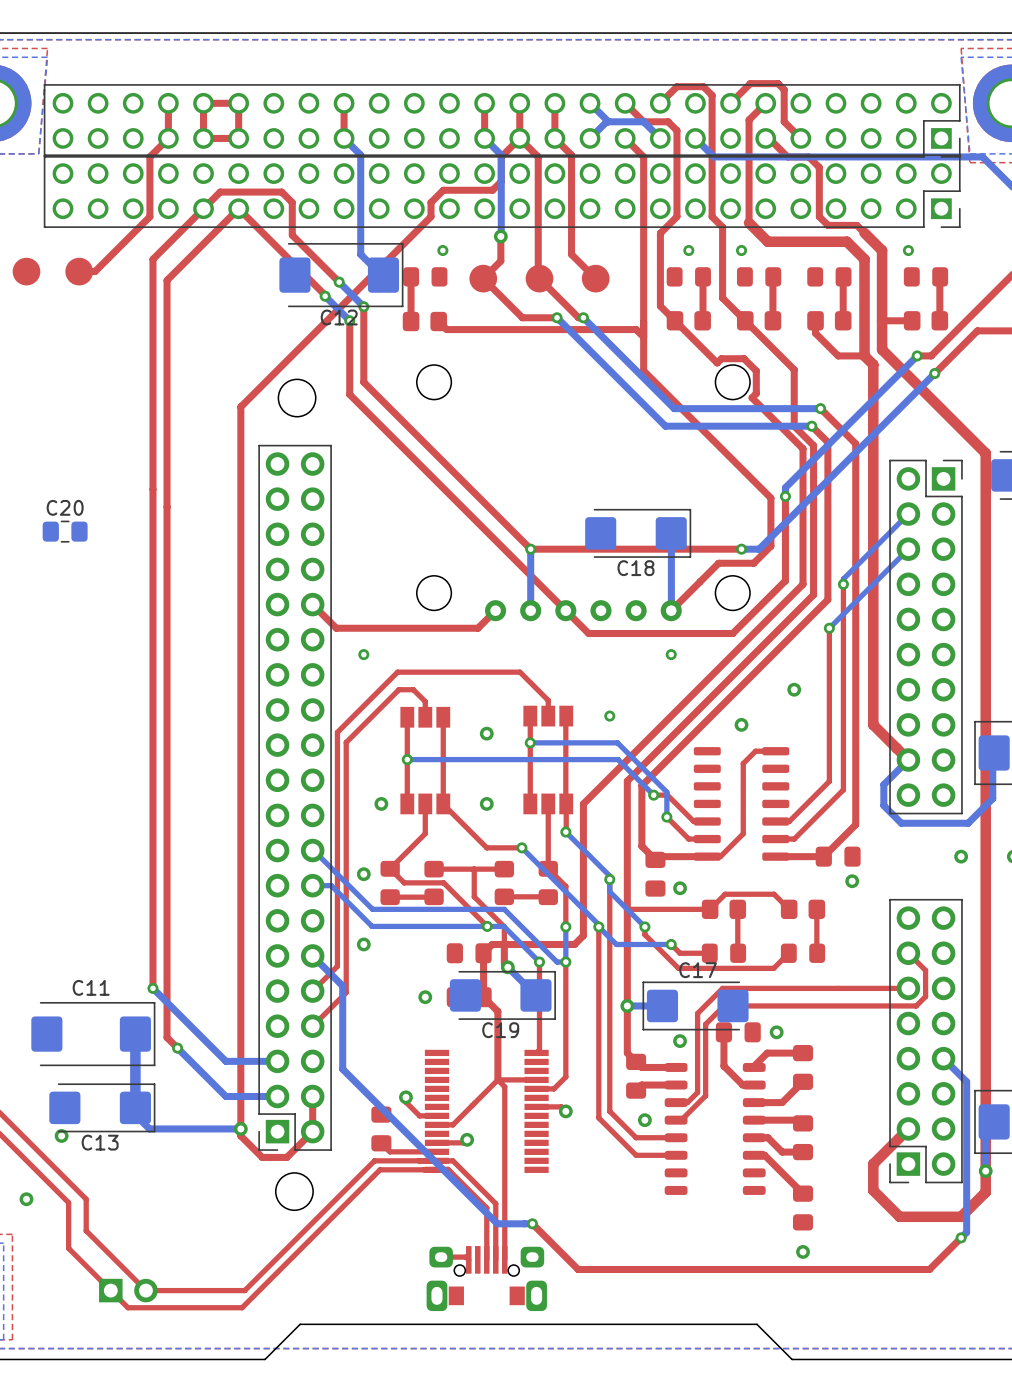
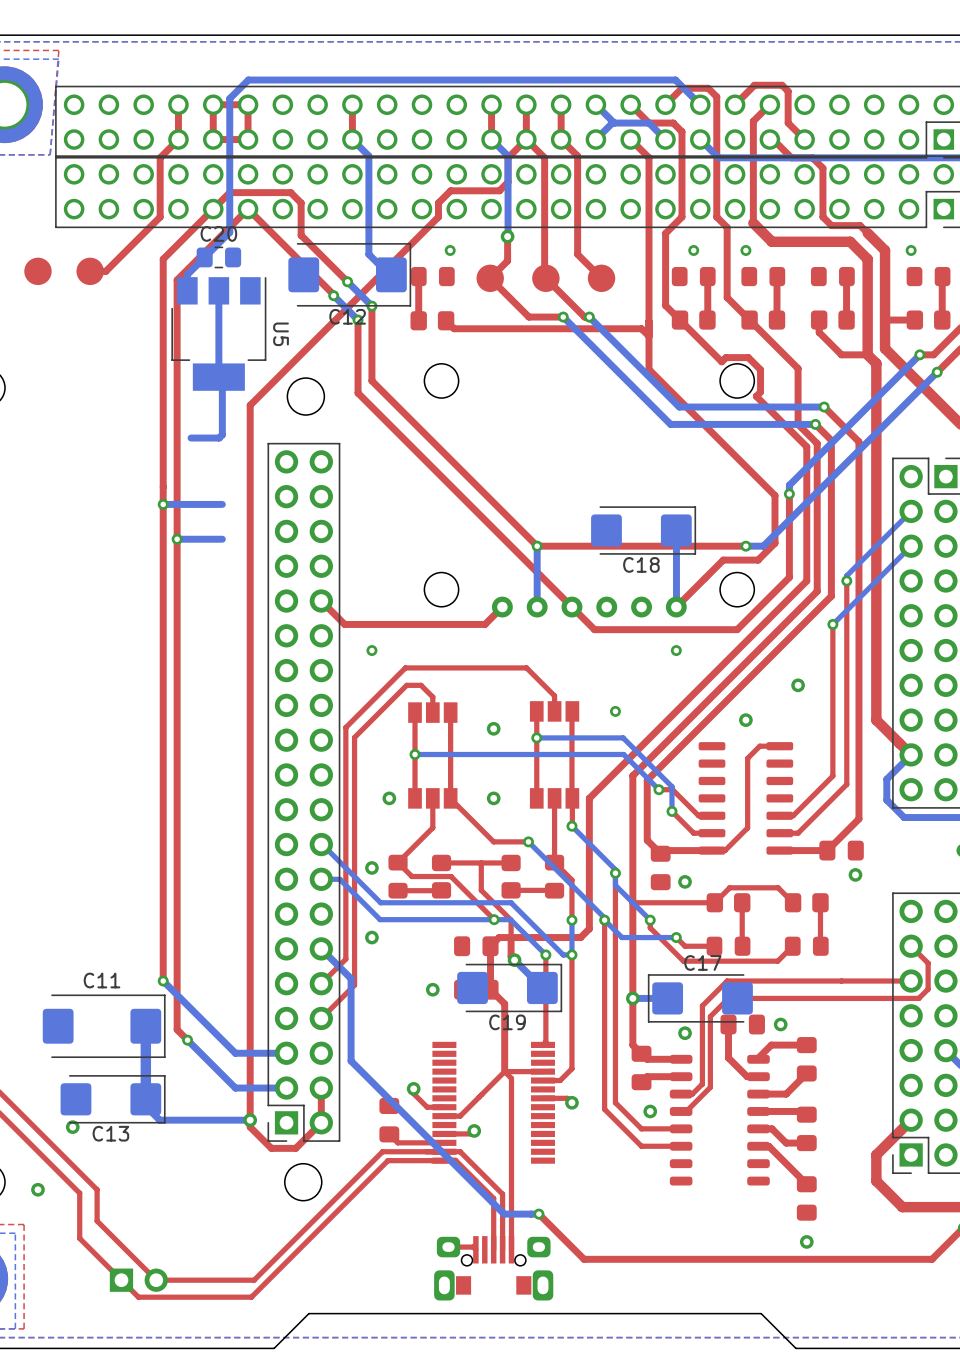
bottom track: none -> (700, 104) (675, 80) (248, 80) (229, 98) (229, 232) (187, 274) (187, 290)
bottom track: none -> (218, 290) (218, 377) (222, 380) (222, 434) (219, 438) (191, 438)
U5: none -> (218, 333)
via: none -> (163, 504)
bottom track: none -> (222, 504) (163, 504)
C20 position: (65, 531) -> (218, 257)
via: none -> (177, 539)
bottom track: none -> (222, 539) (177, 539)

